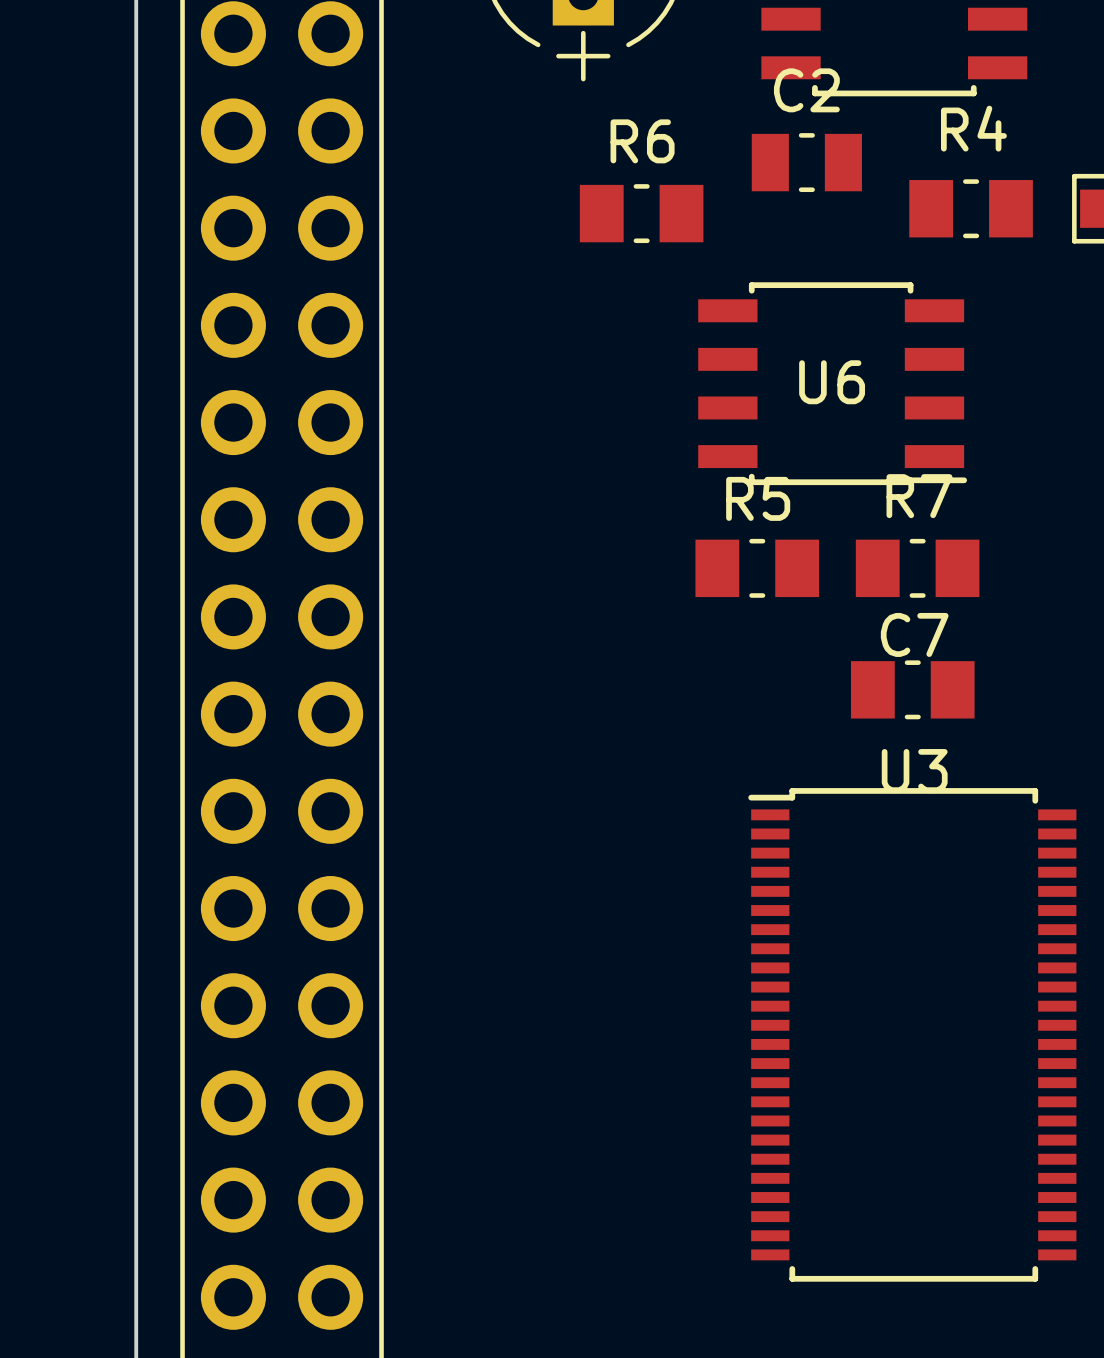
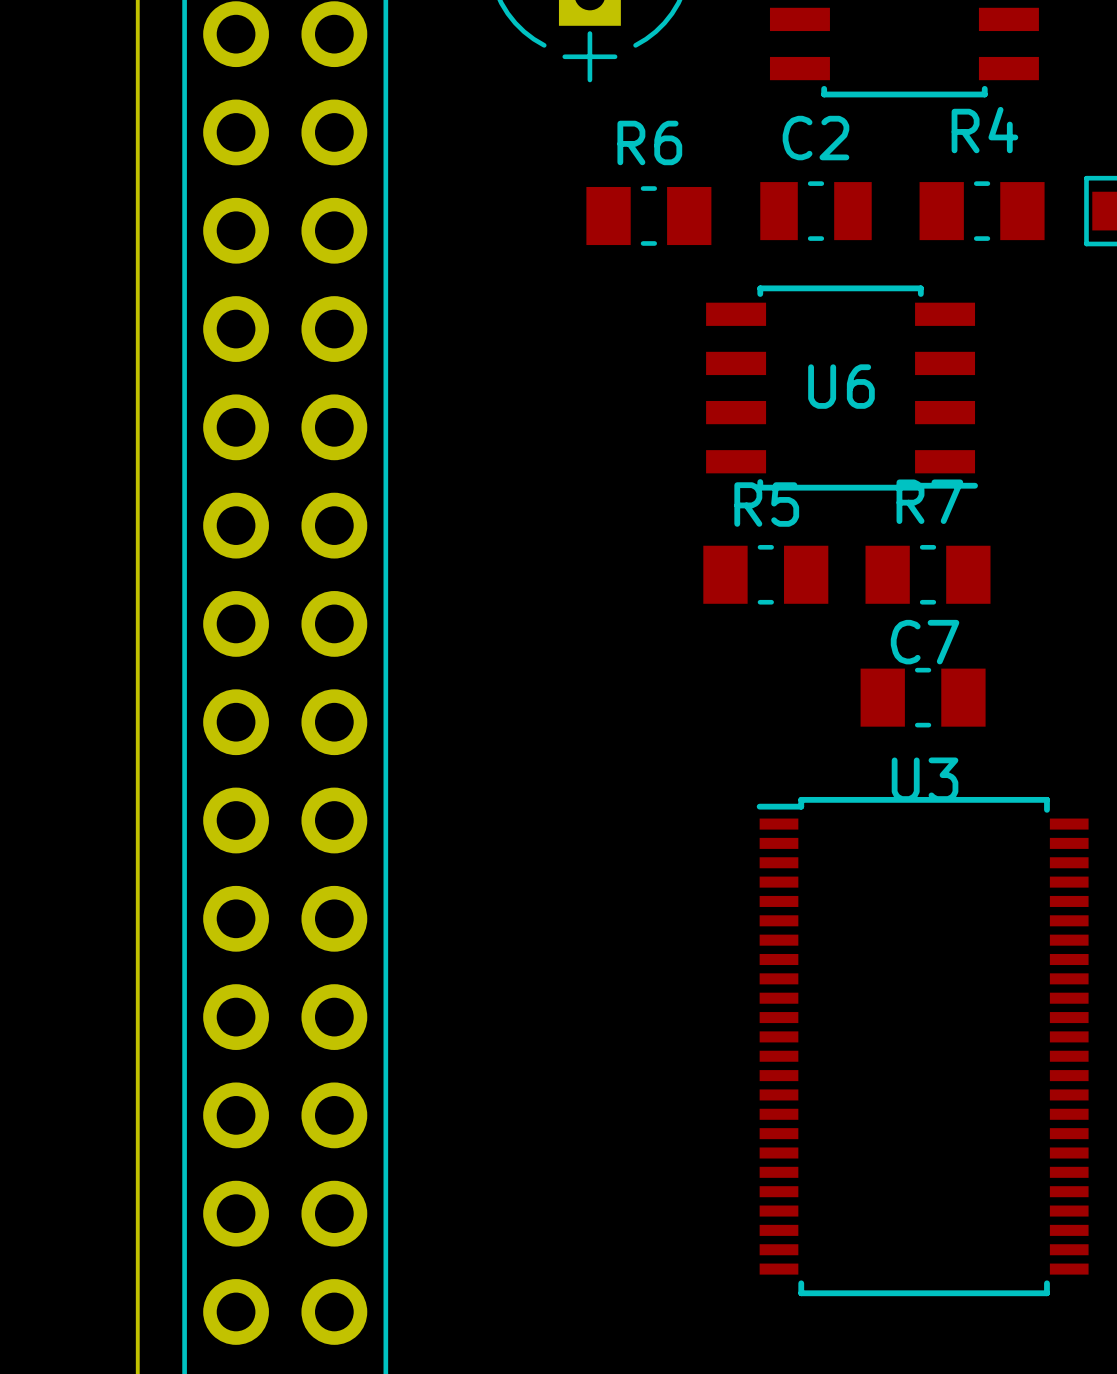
C2 position: (806, 162) -> (815, 211)

